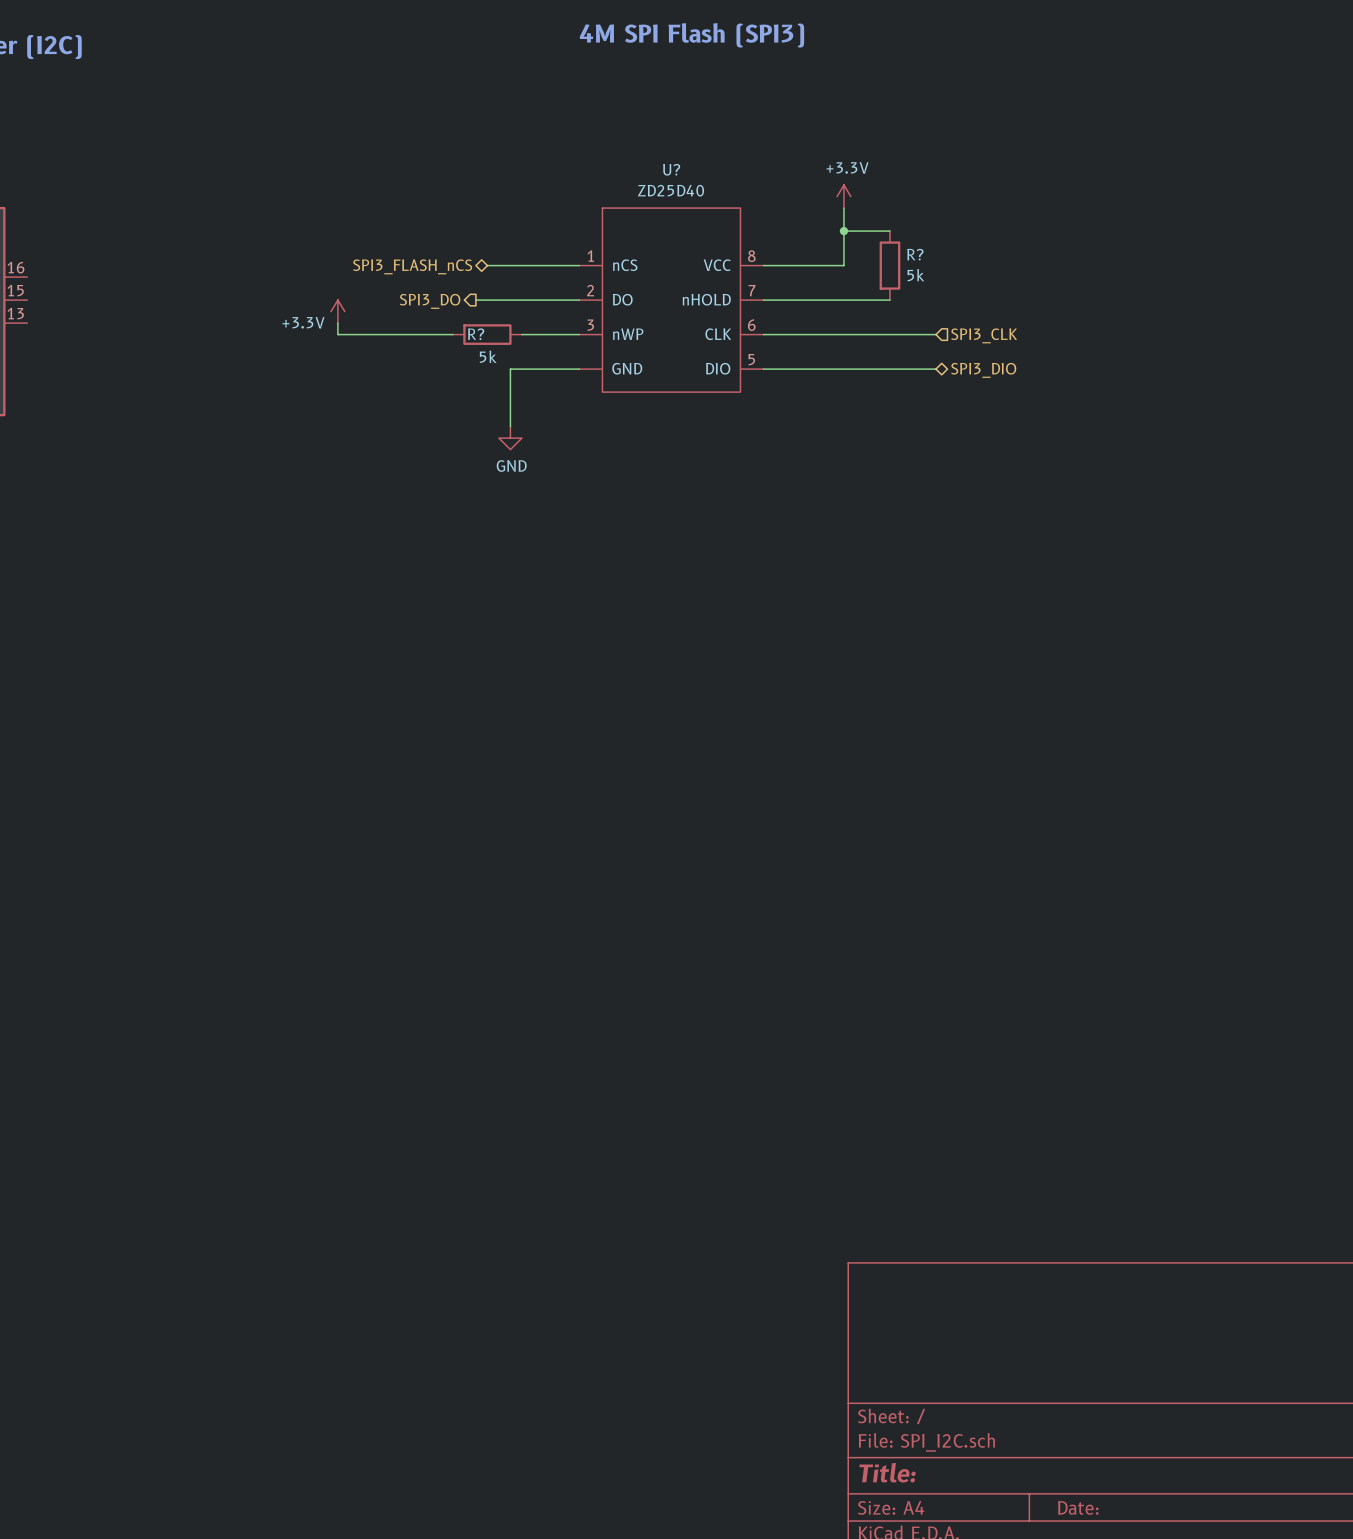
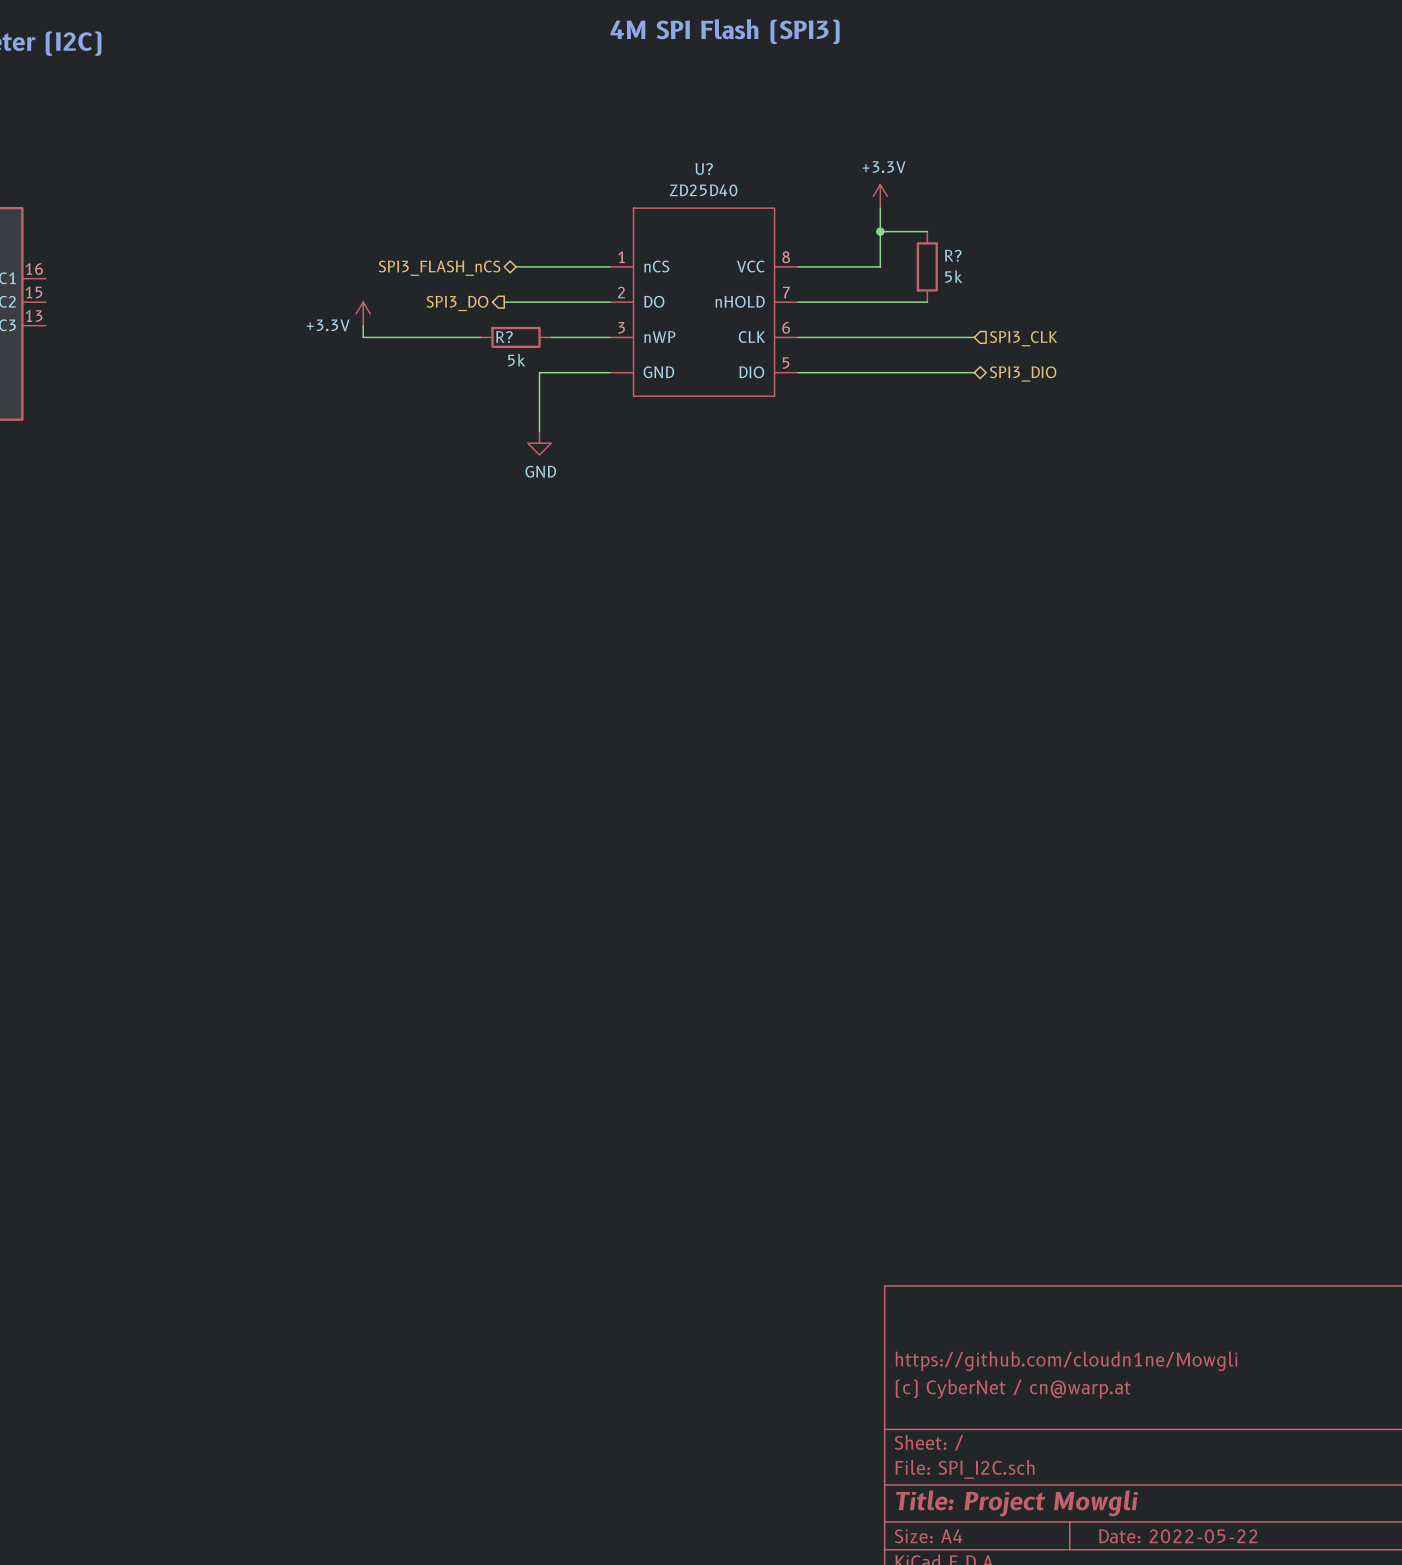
title block: none -> https://github.com/cloudn1ne/Mowgli (1066, 1361)
title block: none -> (c) CyberNet / cn@warp.at (1013, 1389)
title block: Title: (887, 1472) -> Title: Project Mowgli (1017, 1503)
title block: Date: (1078, 1507) -> Date: 2022-05-22 (1178, 1536)

